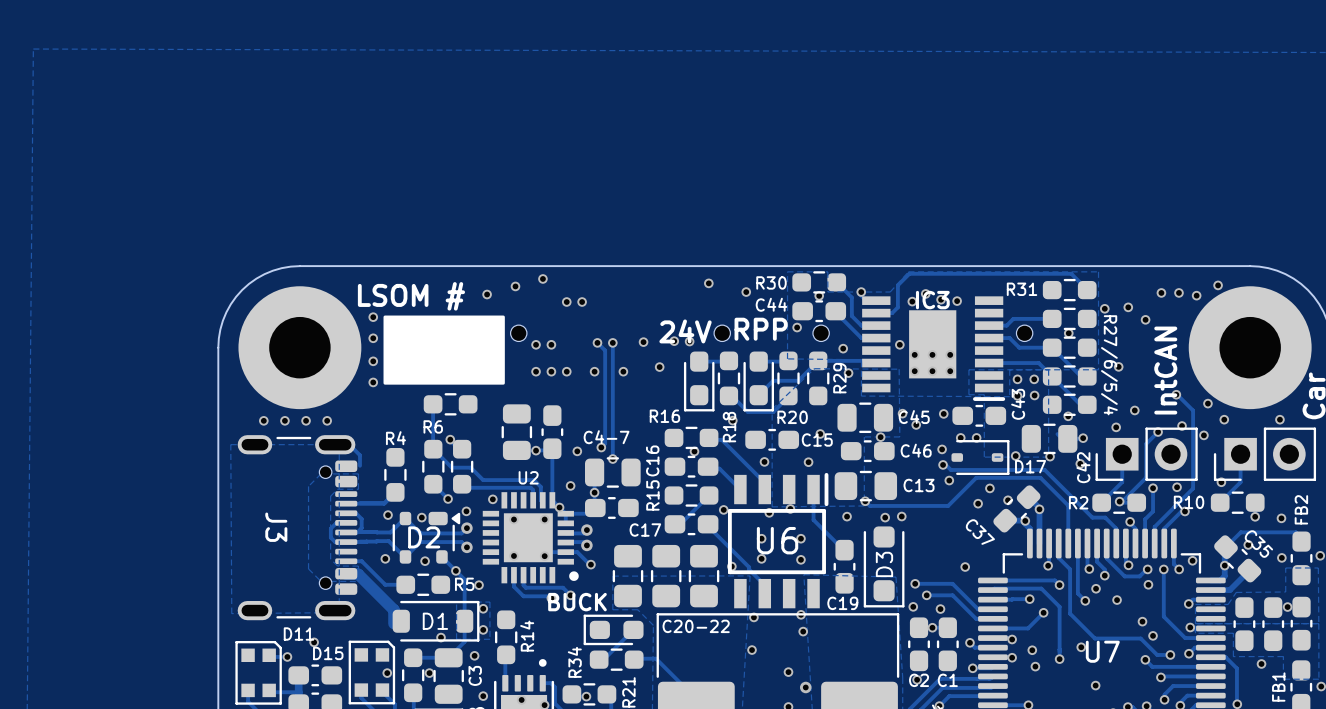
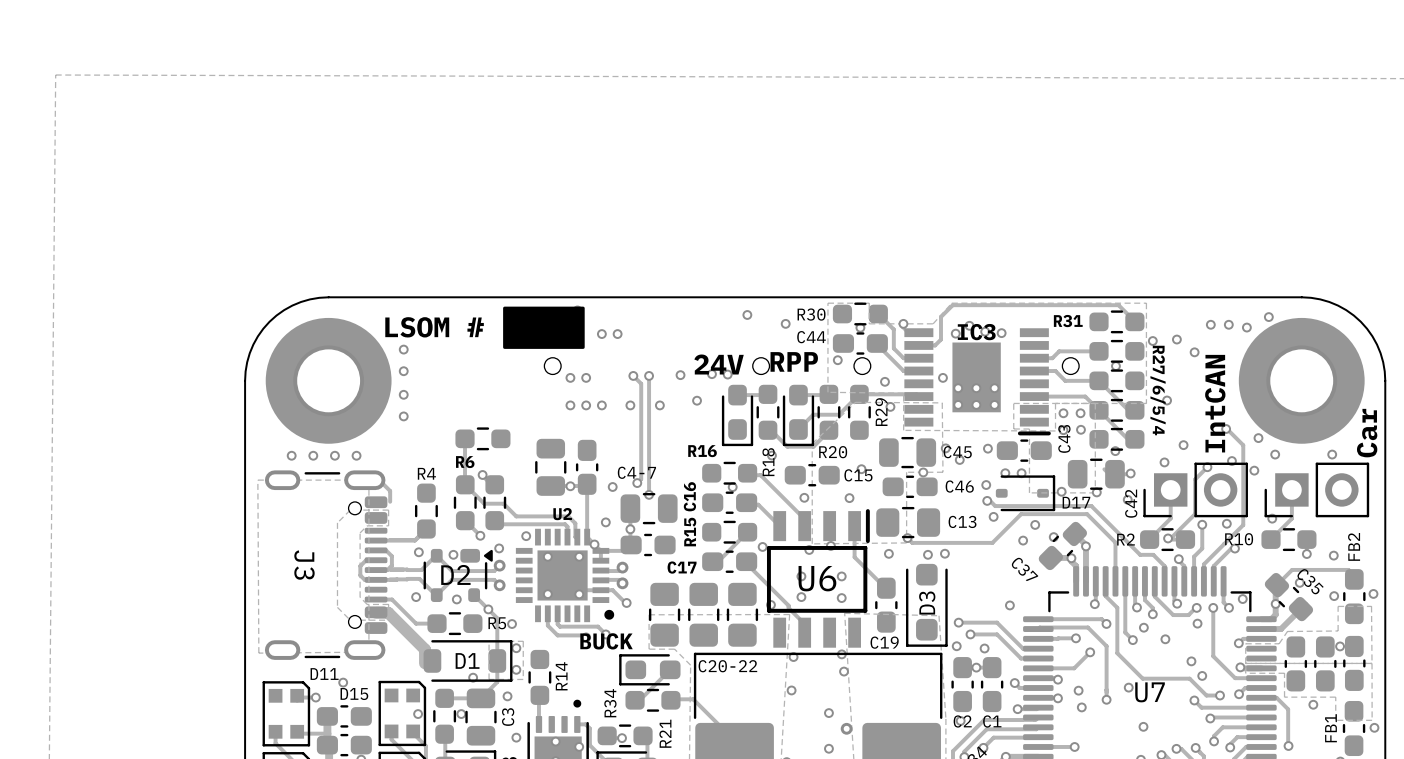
drawing: none -> [503, 306, 585, 349]
drawing: [383, 315, 505, 385] -> none

